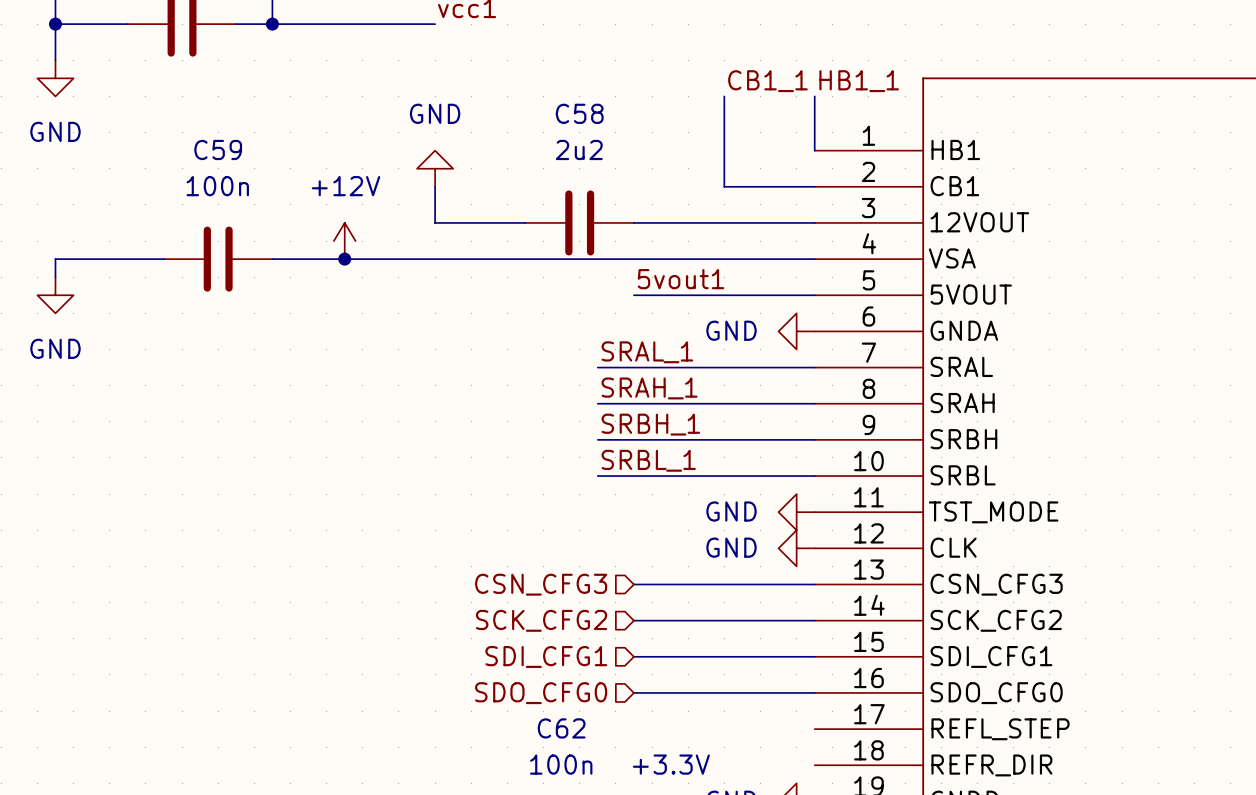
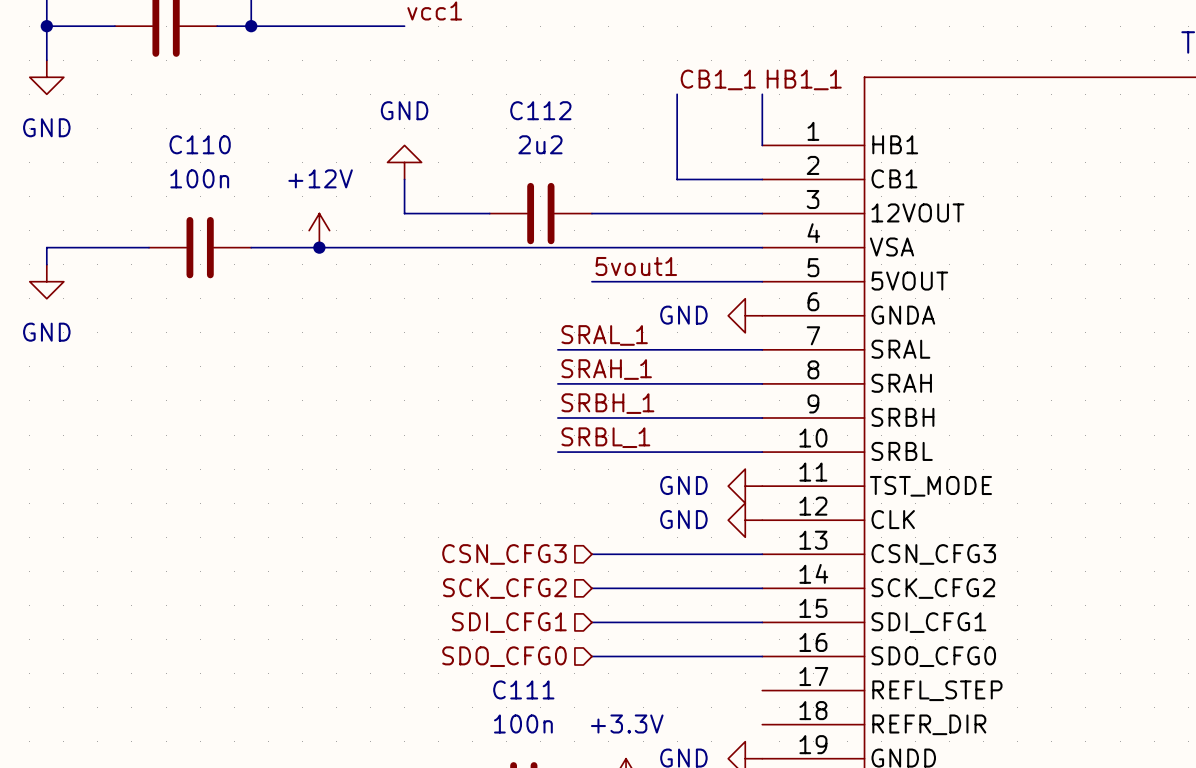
C58 name: C58 (579, 113) -> C112 (540, 110)
C59 name: C59 (218, 149) -> C110 (200, 144)
C62 name: C62 (561, 728) -> C111 (523, 689)

